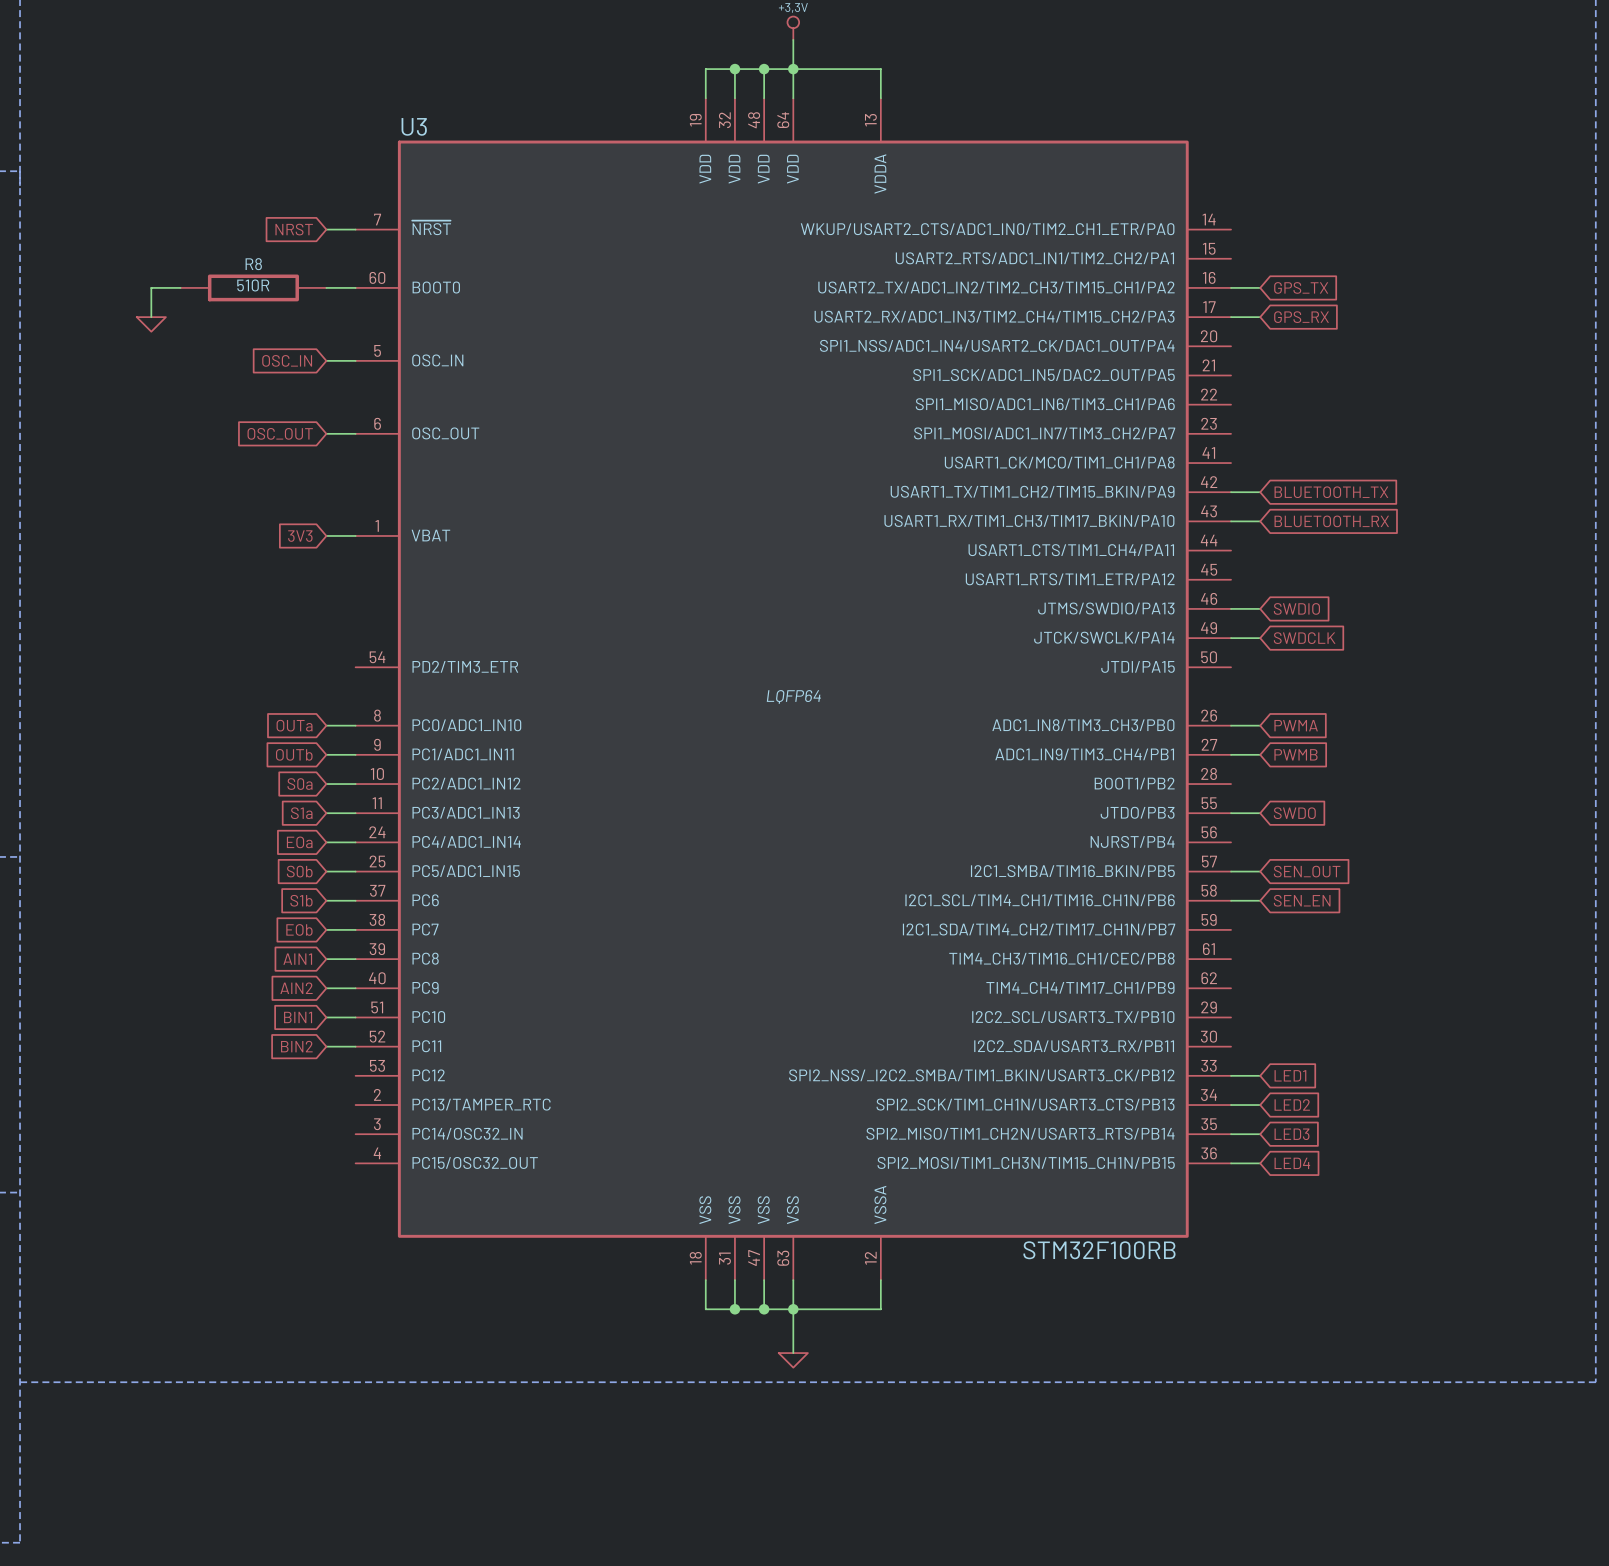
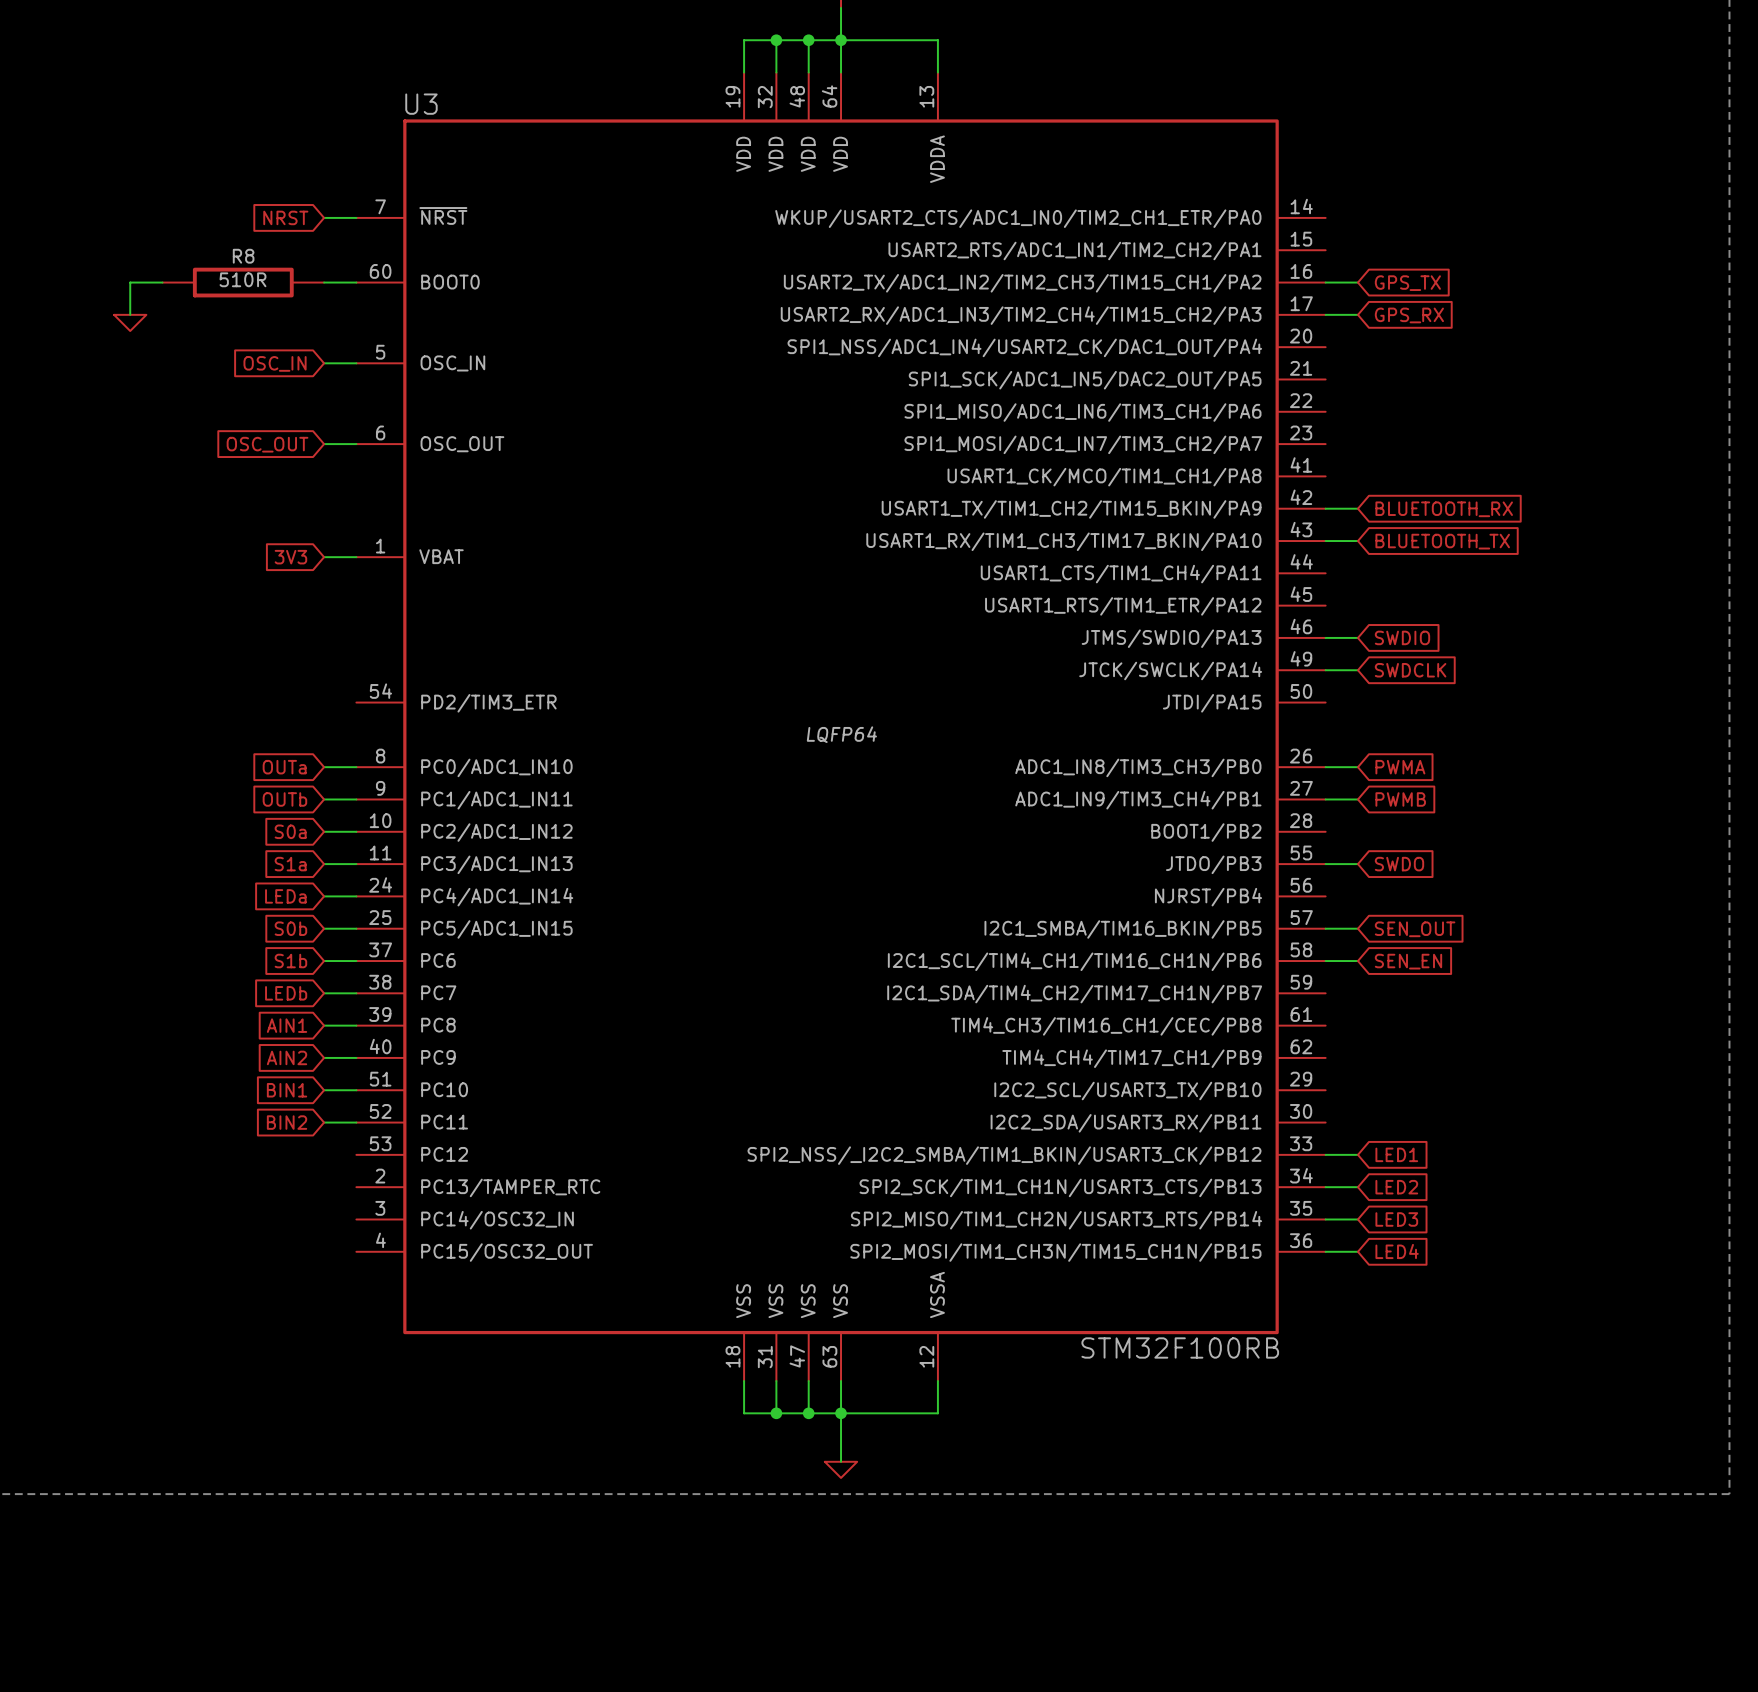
global label: BLUETOOTH_TX (1331, 492) -> BLUETOOTH_RX (1444, 509)
global label: BLUETOOTH_RX (1331, 521) -> BLUETOOTH_TX (1442, 541)
global label: EOa (299, 842) -> LEDa (285, 896)
global label: EOb (299, 929) -> LEDb (286, 993)

